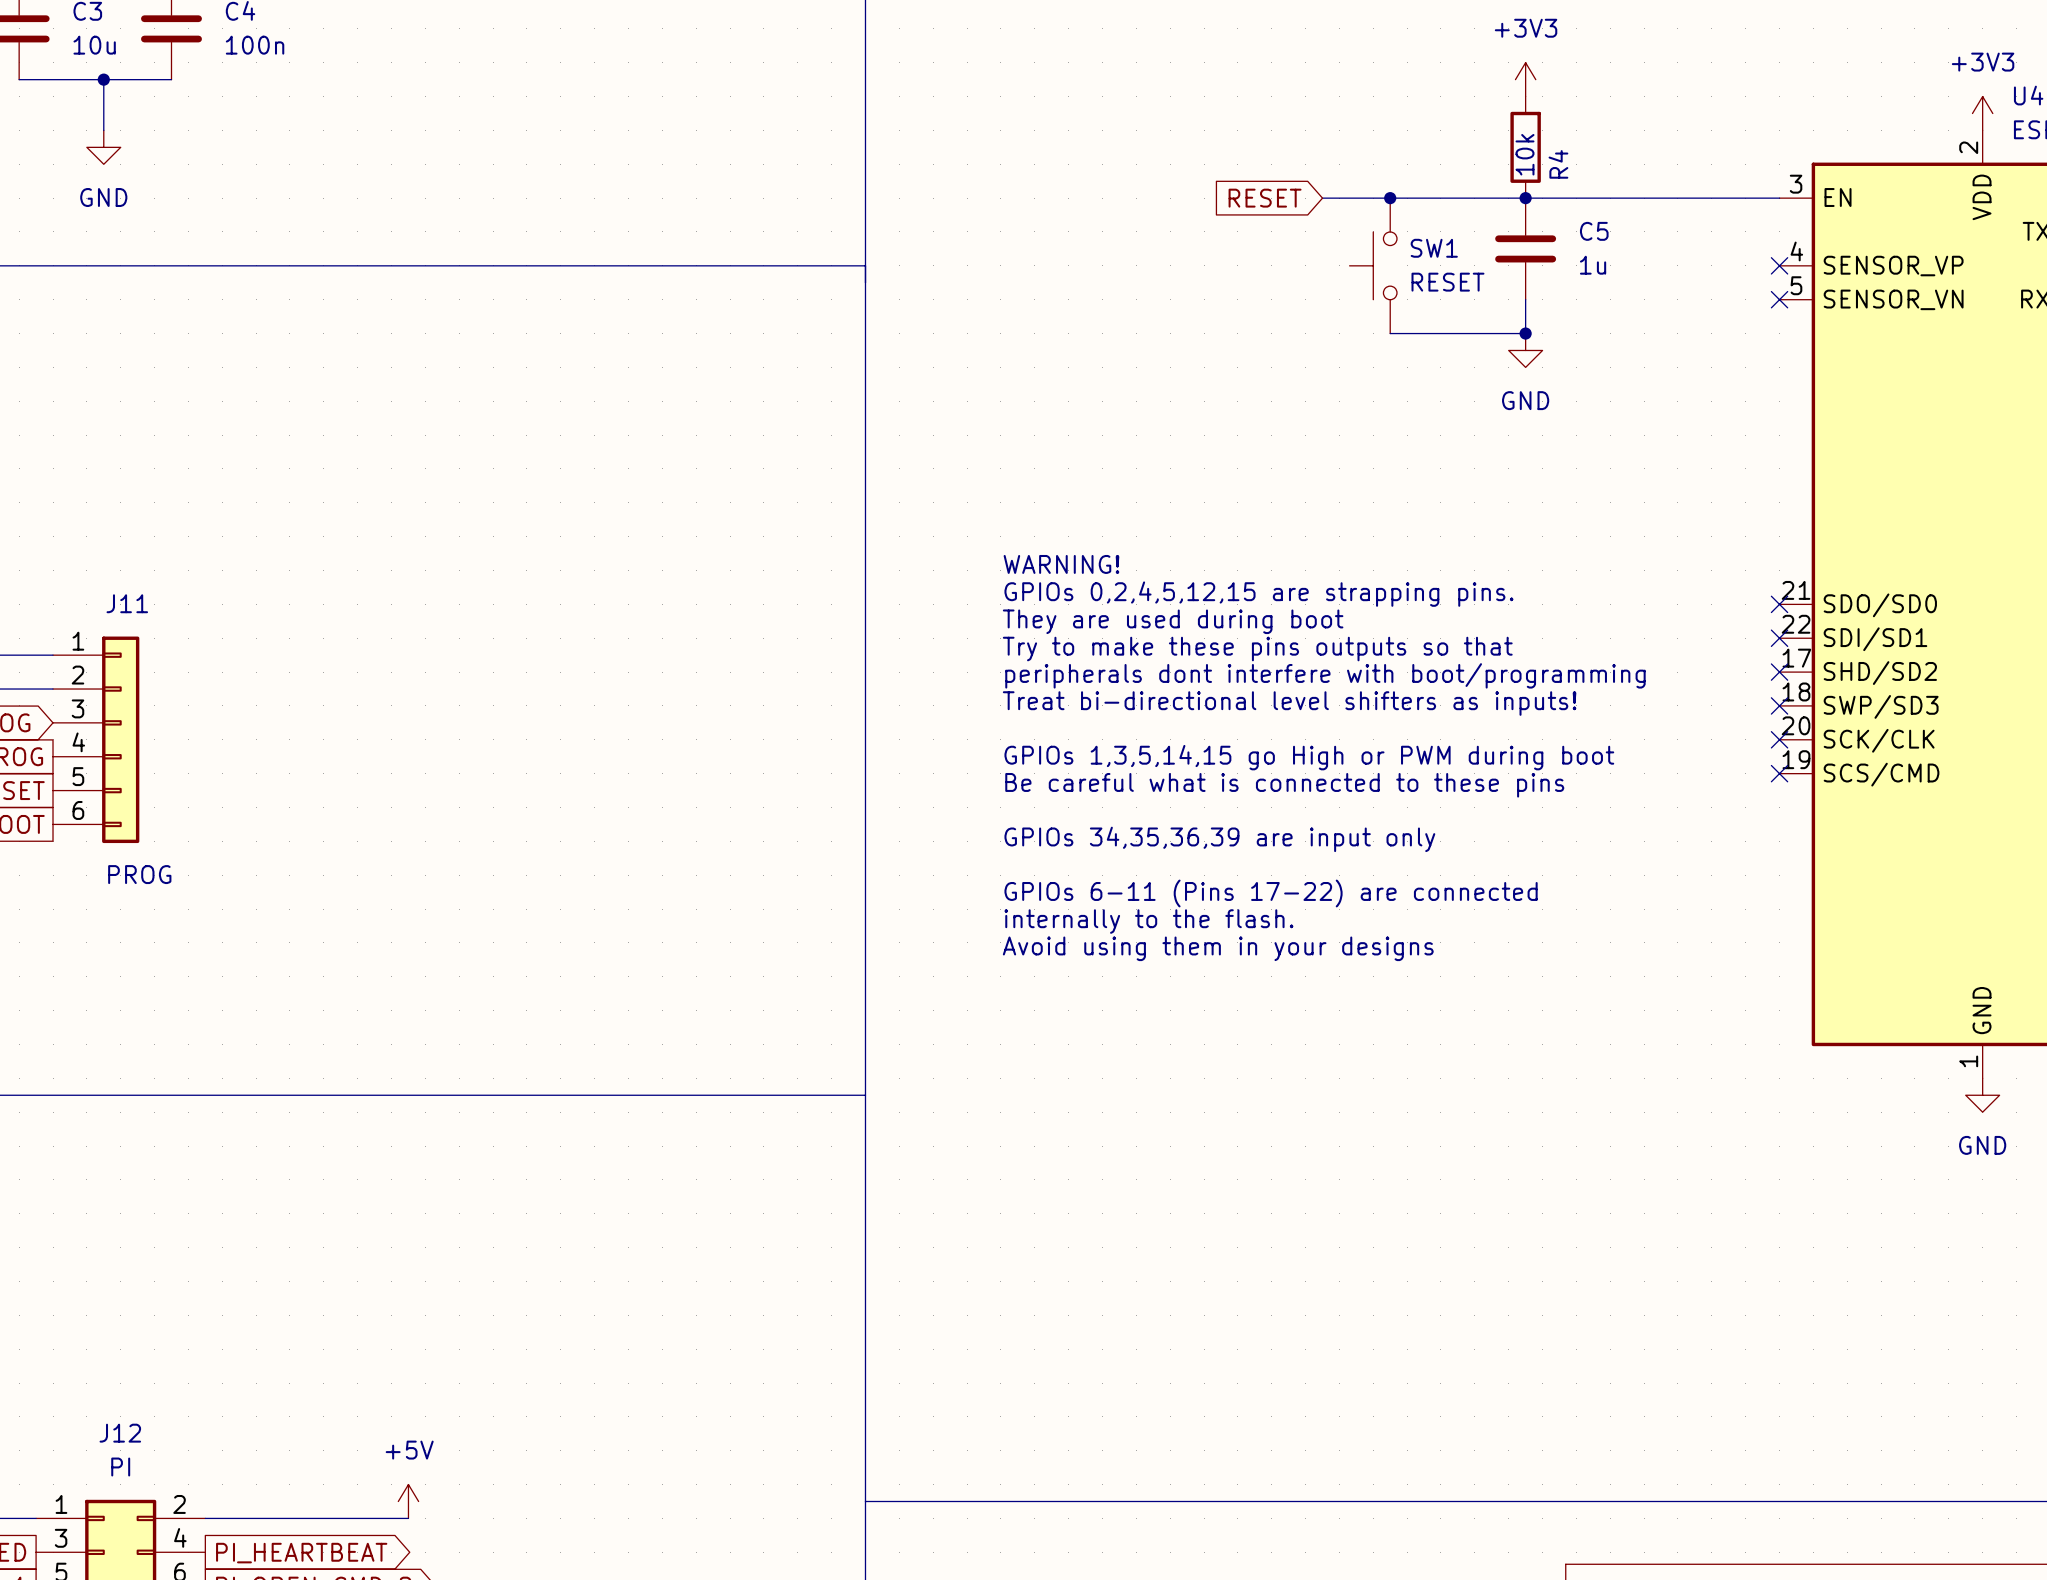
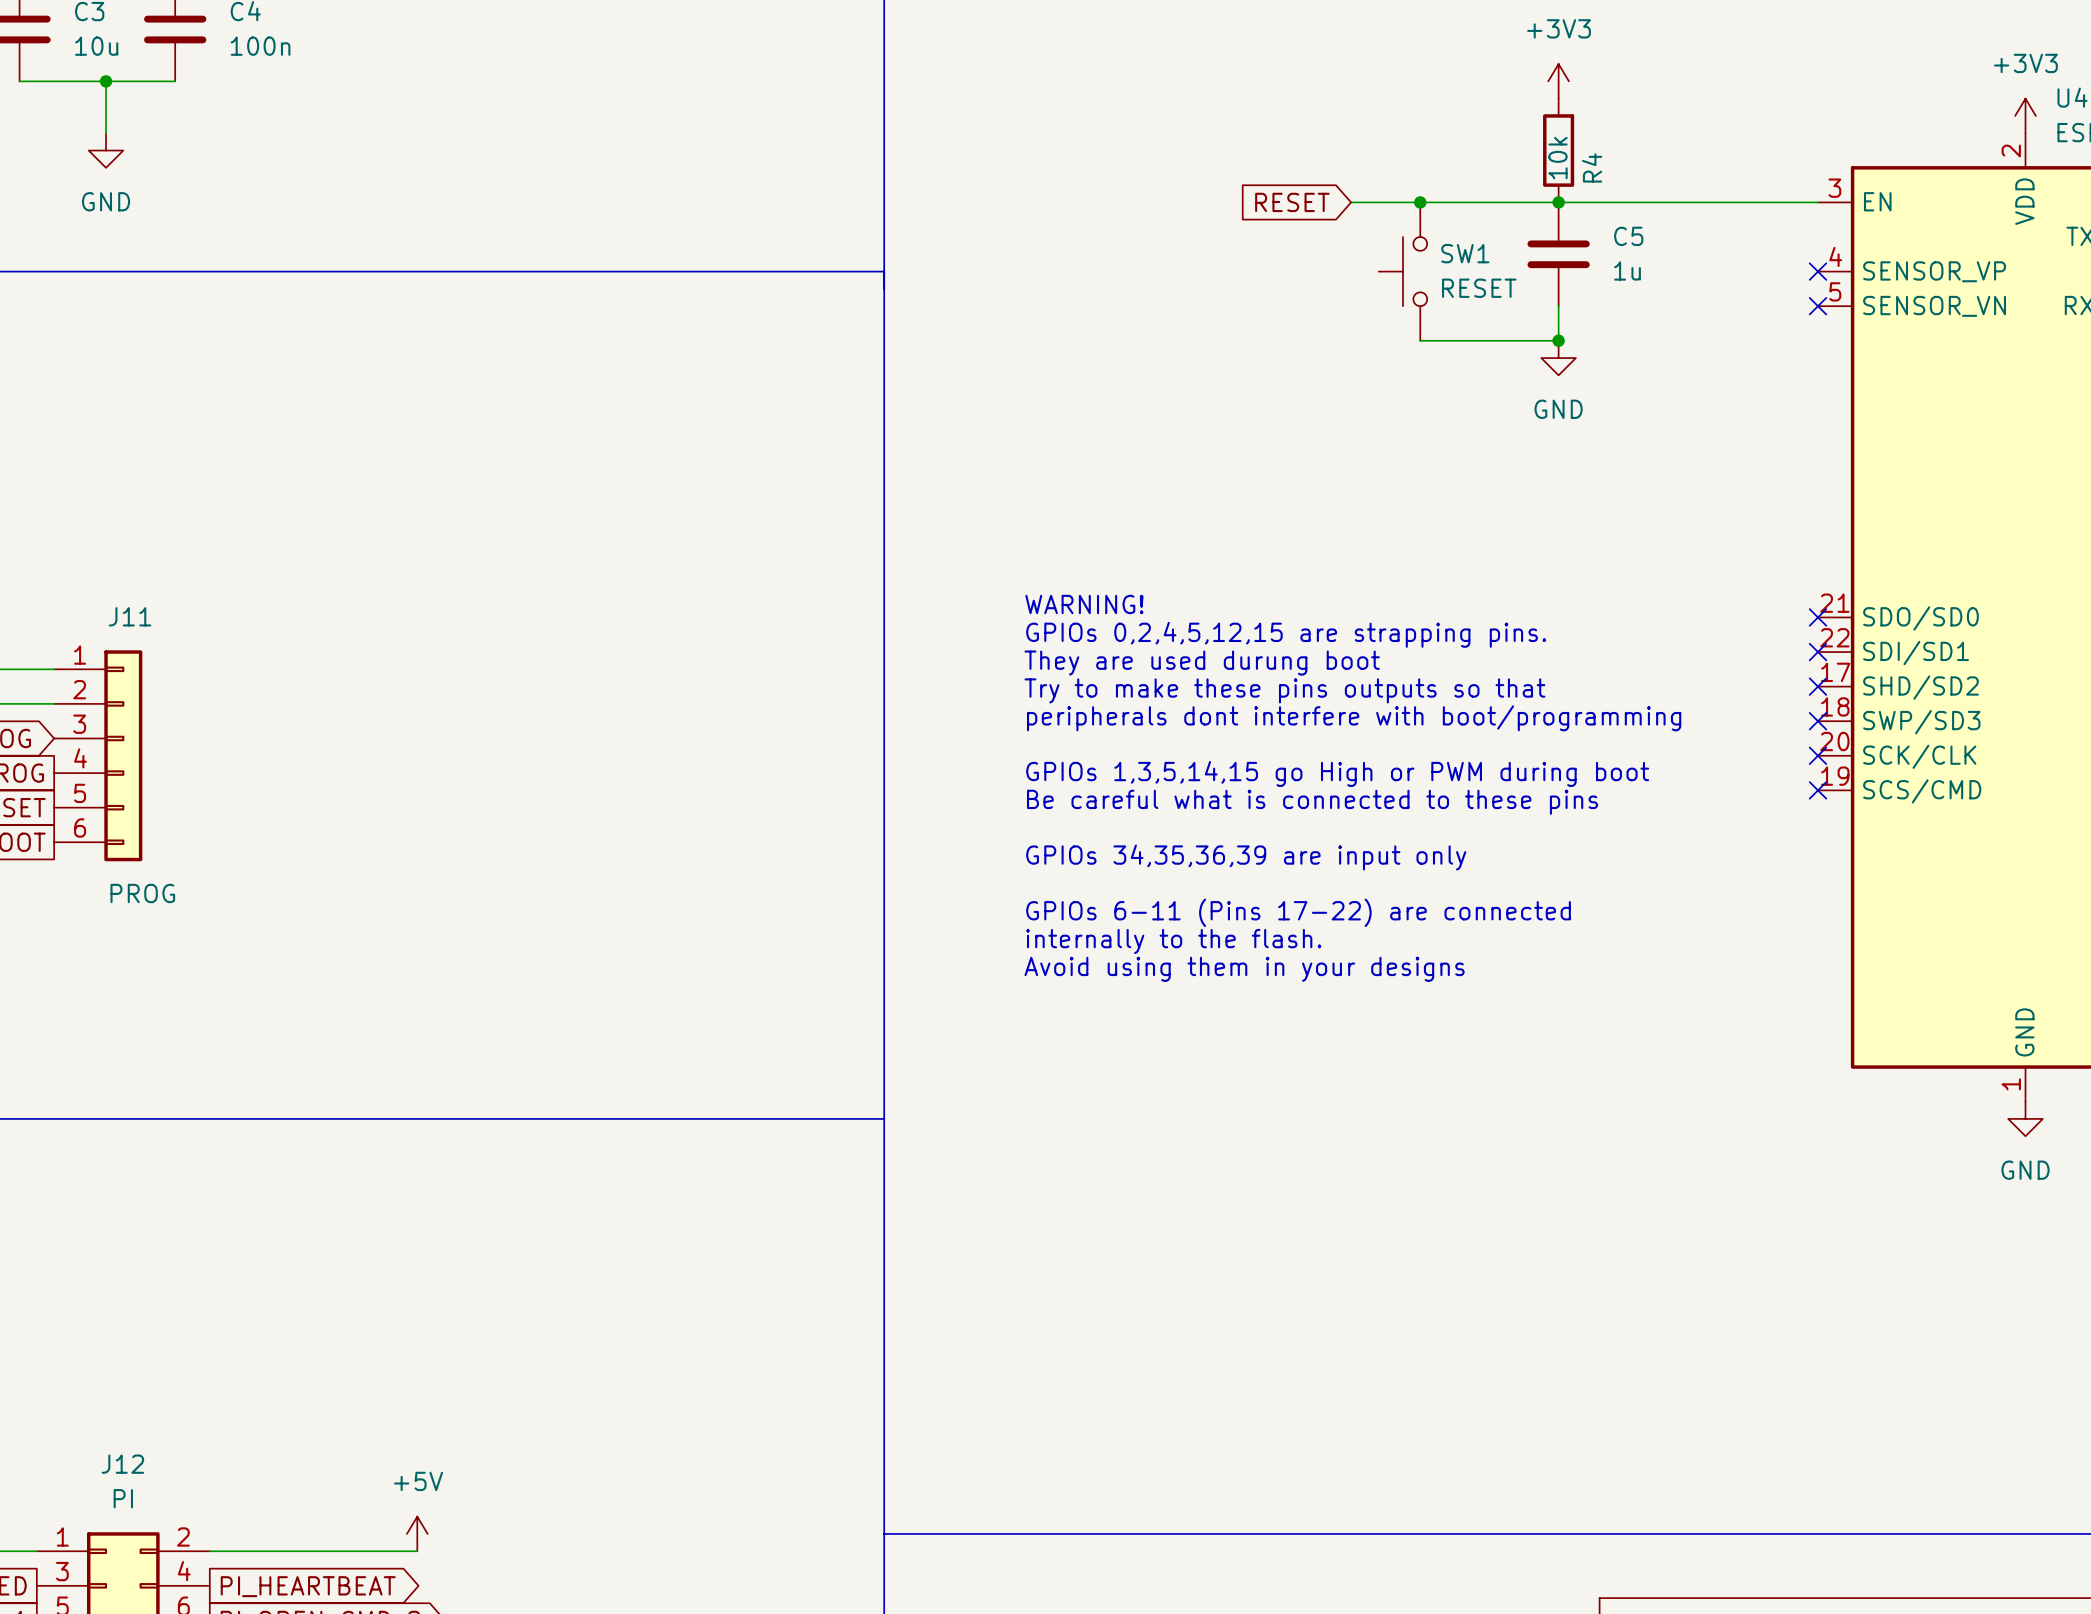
text: WARNING! (1061, 564) -> none
text: GPIOs 0,2,4,5,12,15 are strapping pins. (1258, 594) -> WARNING! (1084, 604)
text: They are used during boot (1173, 621) -> GPIOs 0,2,4,5,12,15 are strapping pins. (1286, 634)
text: Try to make these pins outputs so that (1257, 649) -> They are used durung boot (1202, 663)
text: peripherals dont interfere with boot/programming (1325, 675) -> Try to make these pins outputs so that (1284, 690)
text: Treat bi-directional level shifters as inputs! (1289, 703) -> peripherals dont interfere with boot/programming (1354, 718)

